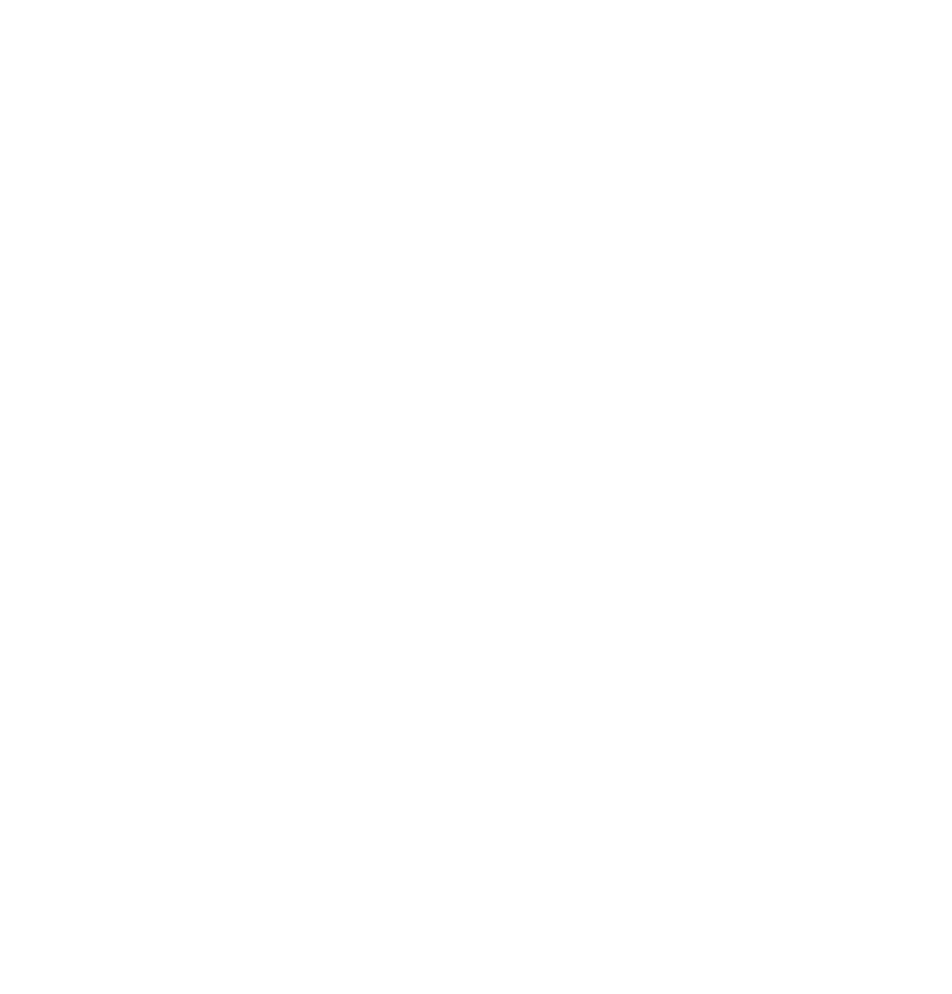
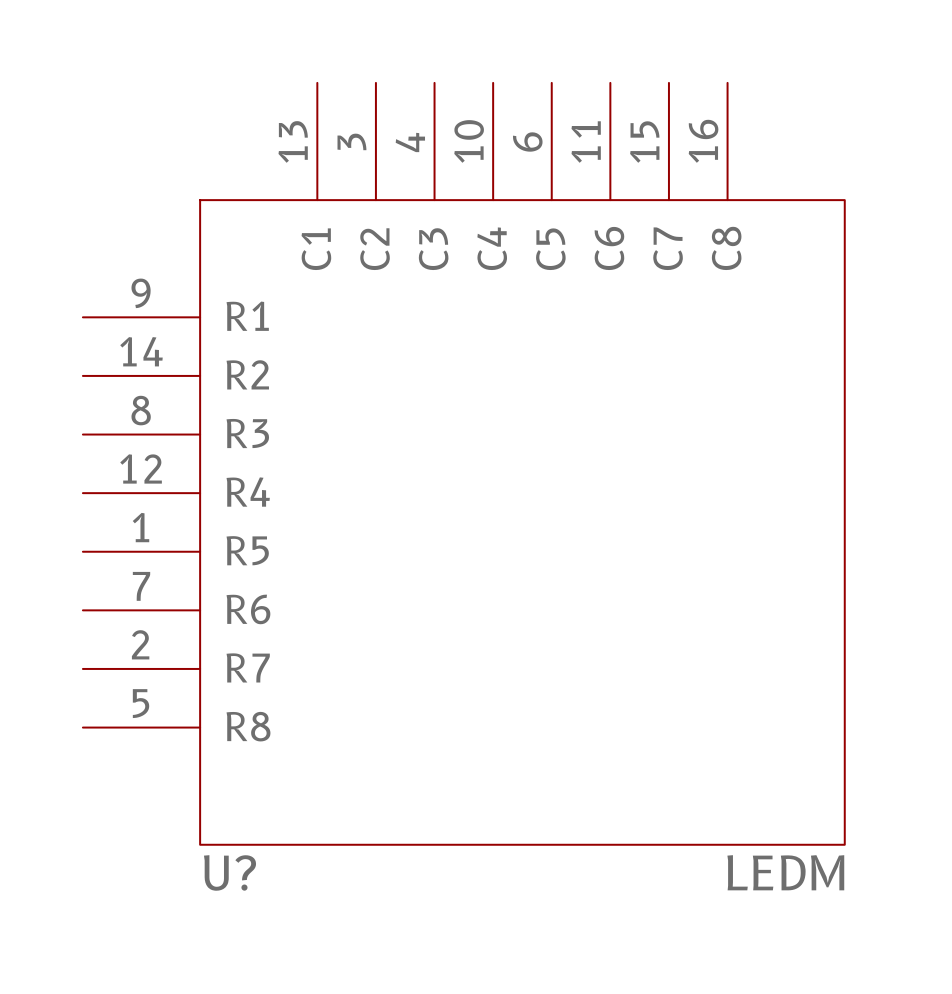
U?: none -> LEDM (463, 463)

